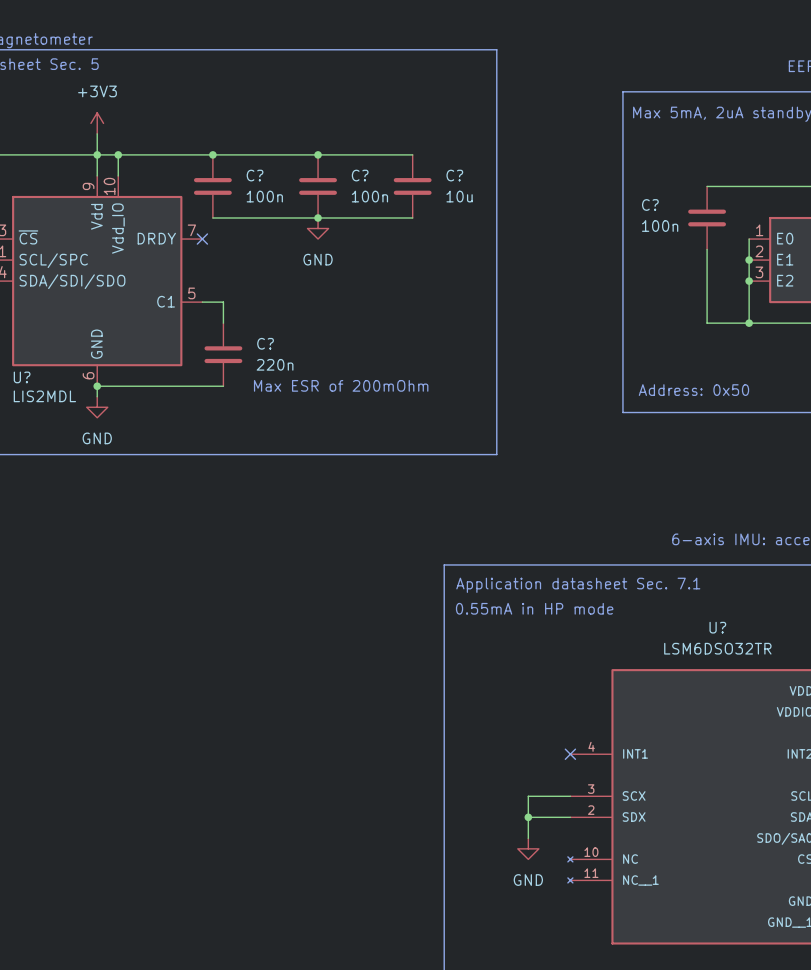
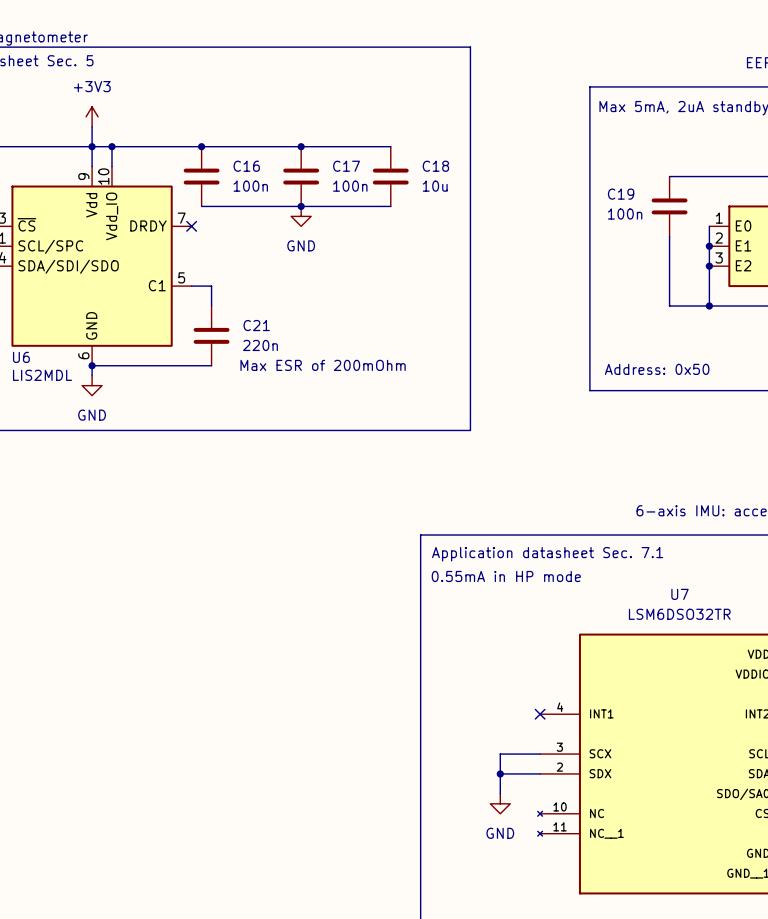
C? name: C? (255, 175) -> C16 (246, 166)
C? name: C? (360, 175) -> C17 (346, 166)
C? name: C? (454, 175) -> C18 (435, 166)
C? name: C? (650, 204) -> C19 (621, 194)
C? name: C? (265, 343) -> C21 (256, 325)
U? name: U? (22, 377) -> U6 (21, 357)
U? name: U? (717, 627) -> U7 (680, 594)

